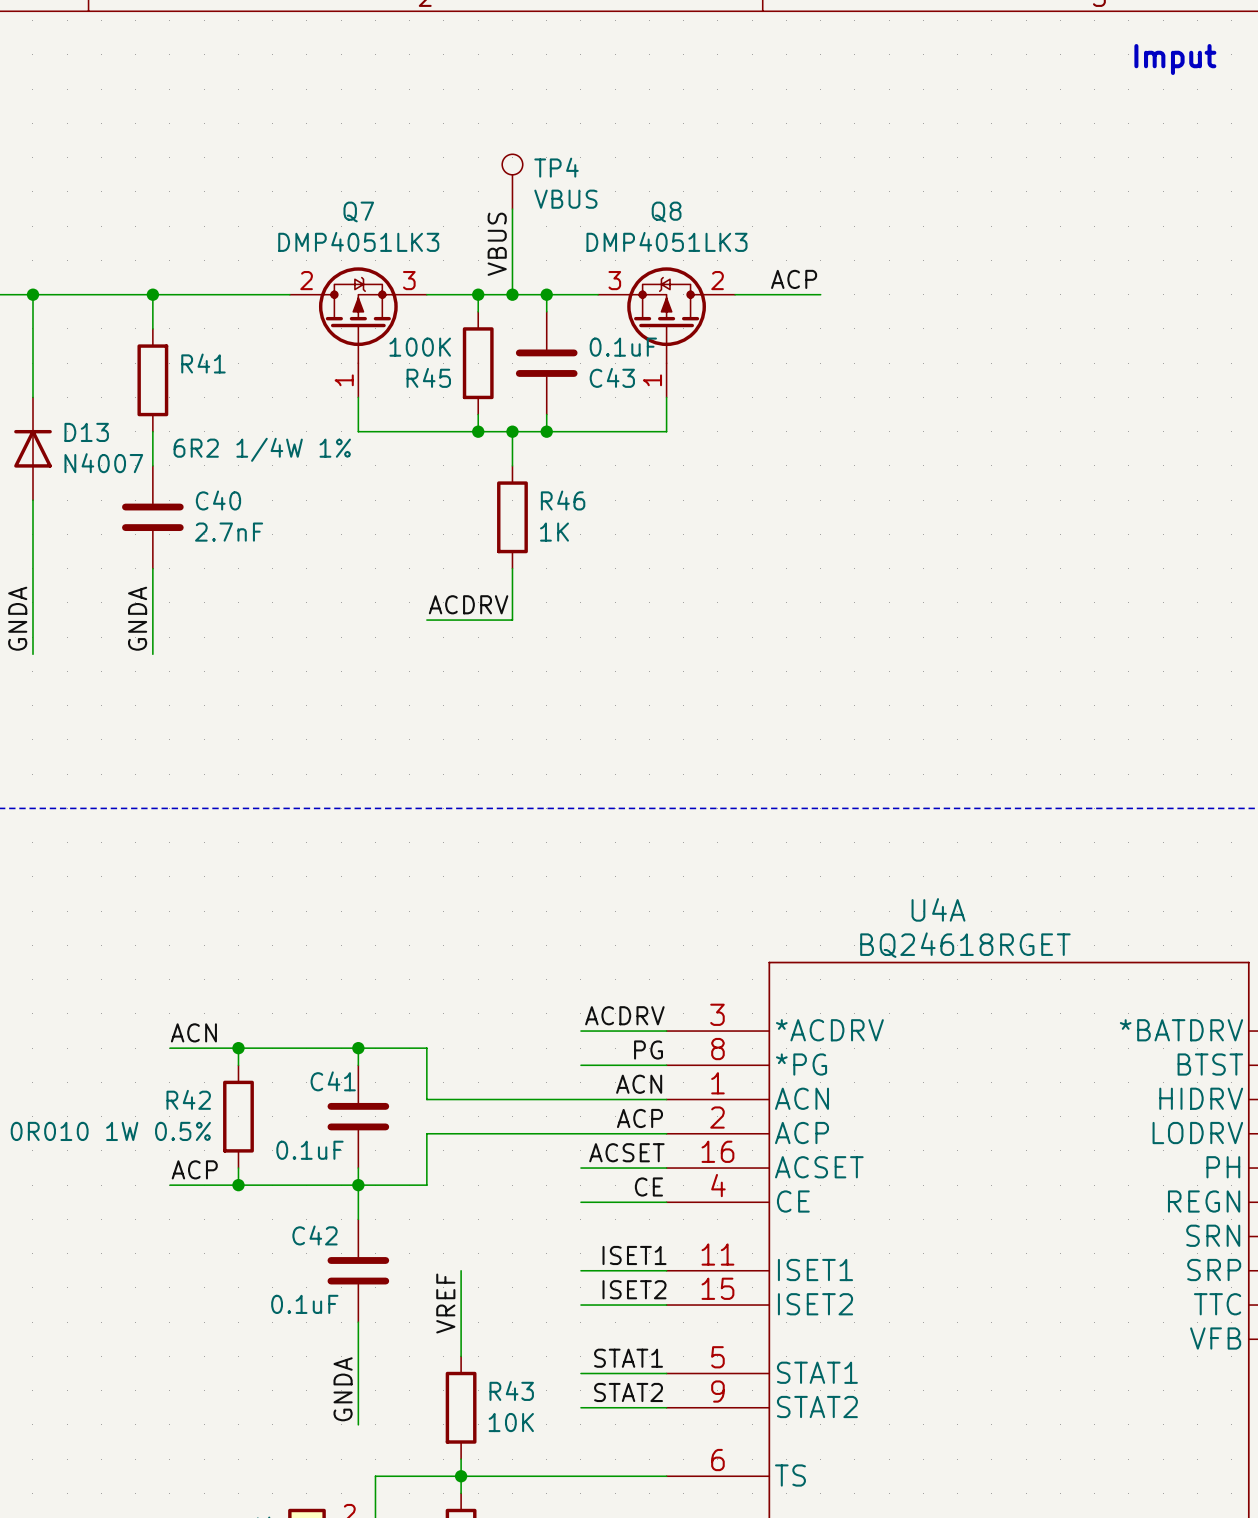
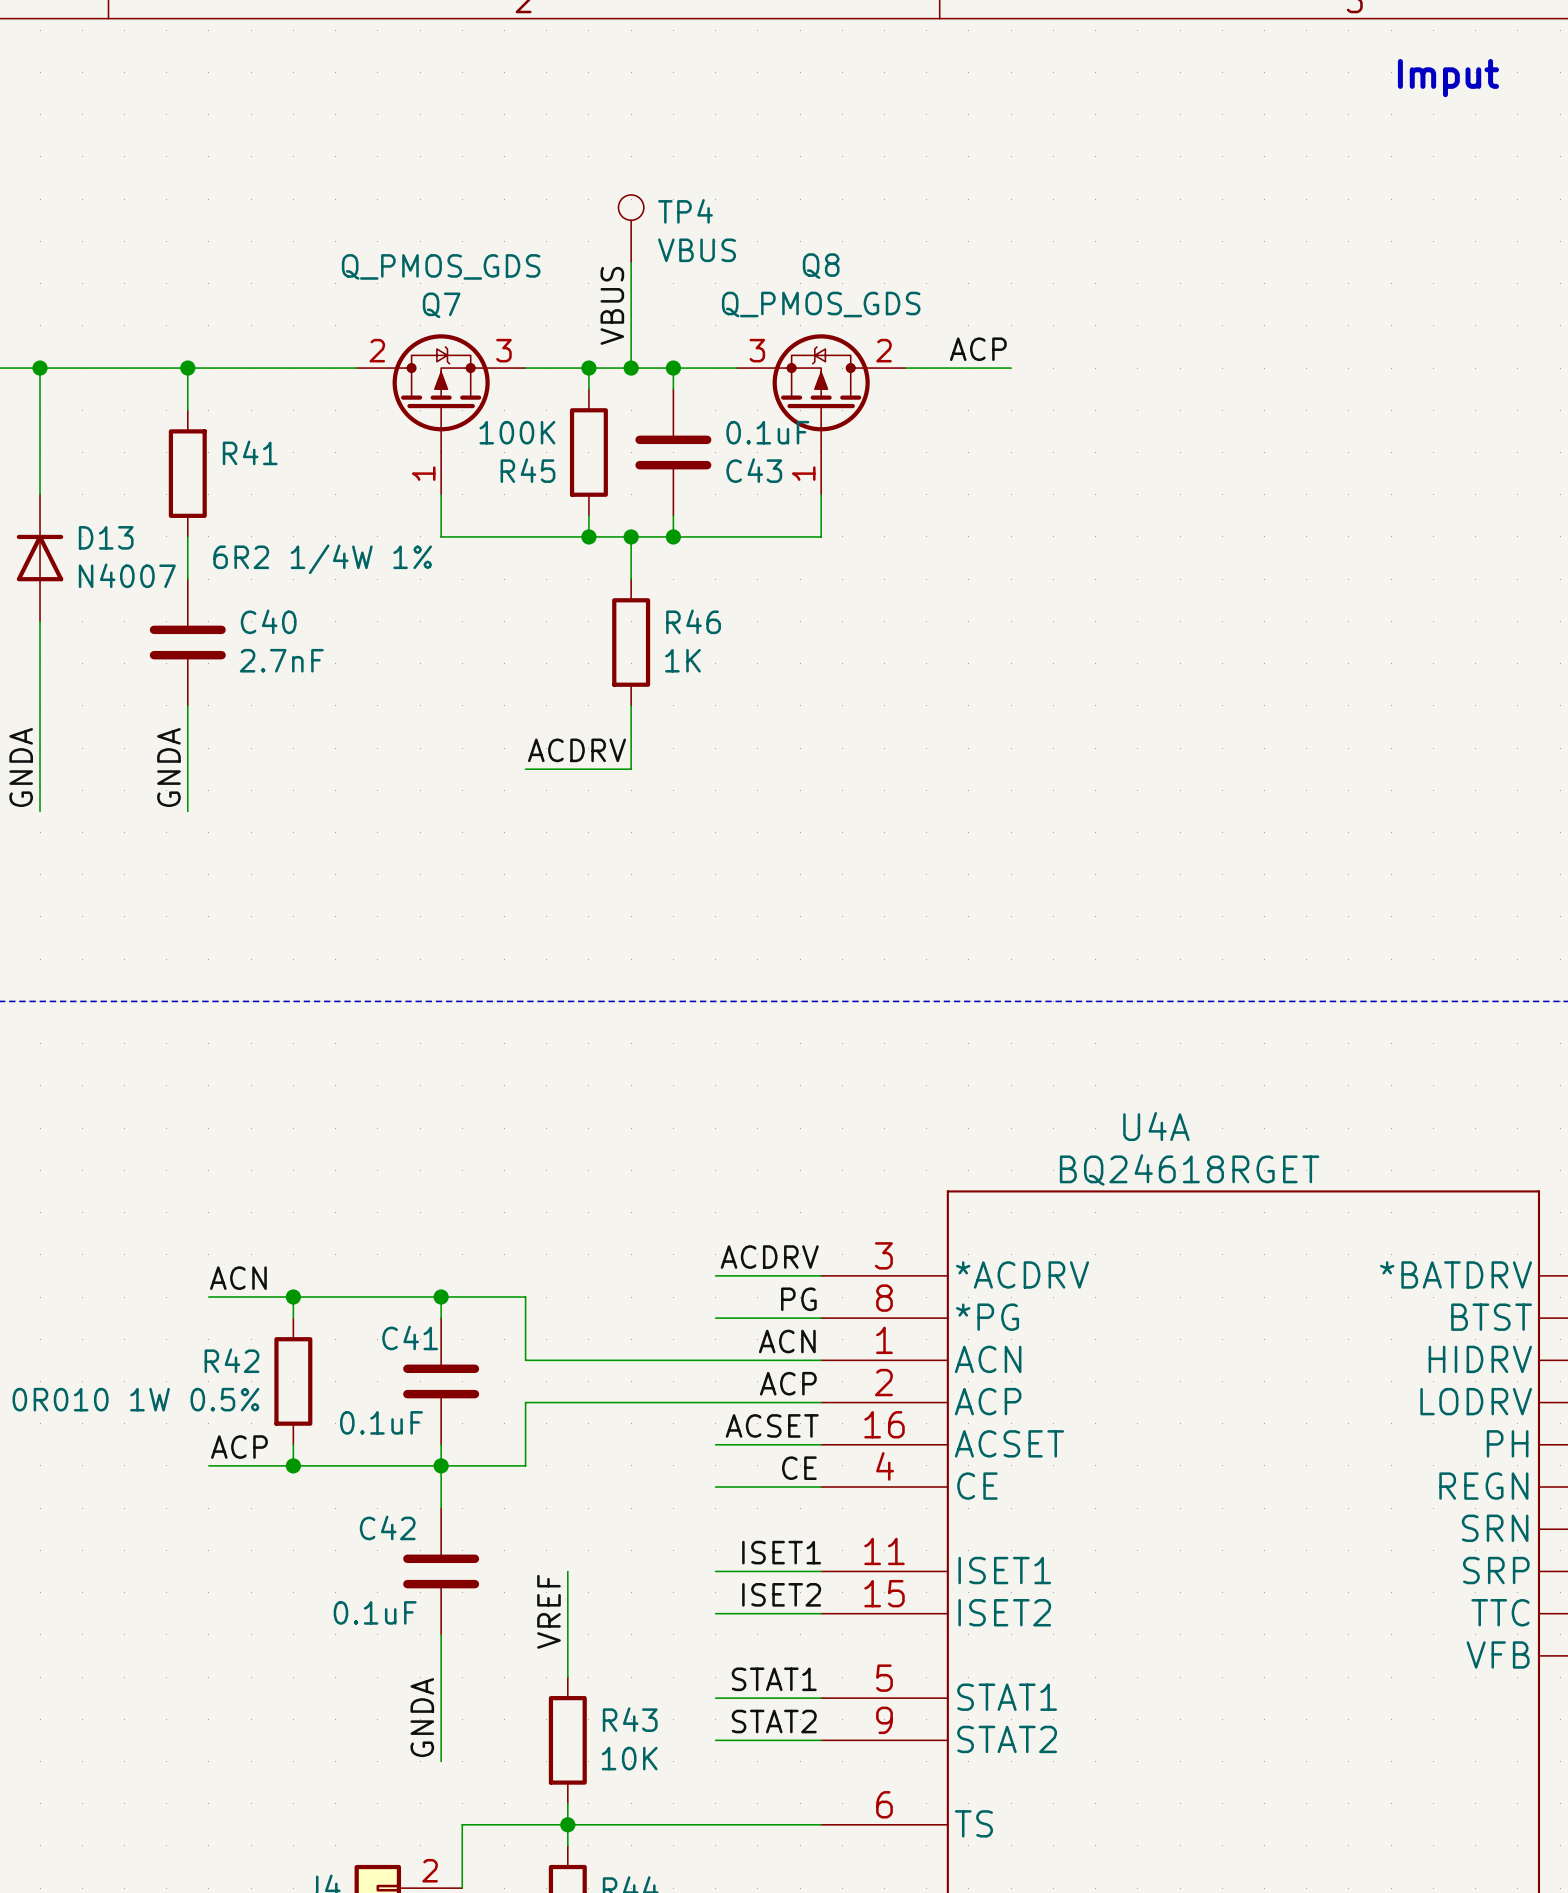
Q7 name position: Q7 (358, 211) -> Q7 (441, 305)
Q7 value: DMP4051LK3 (358, 241) -> Q_PMOS_GDS (441, 266)
Q8 value: DMP4051LK3 (666, 241) -> Q_PMOS_GDS (821, 304)

